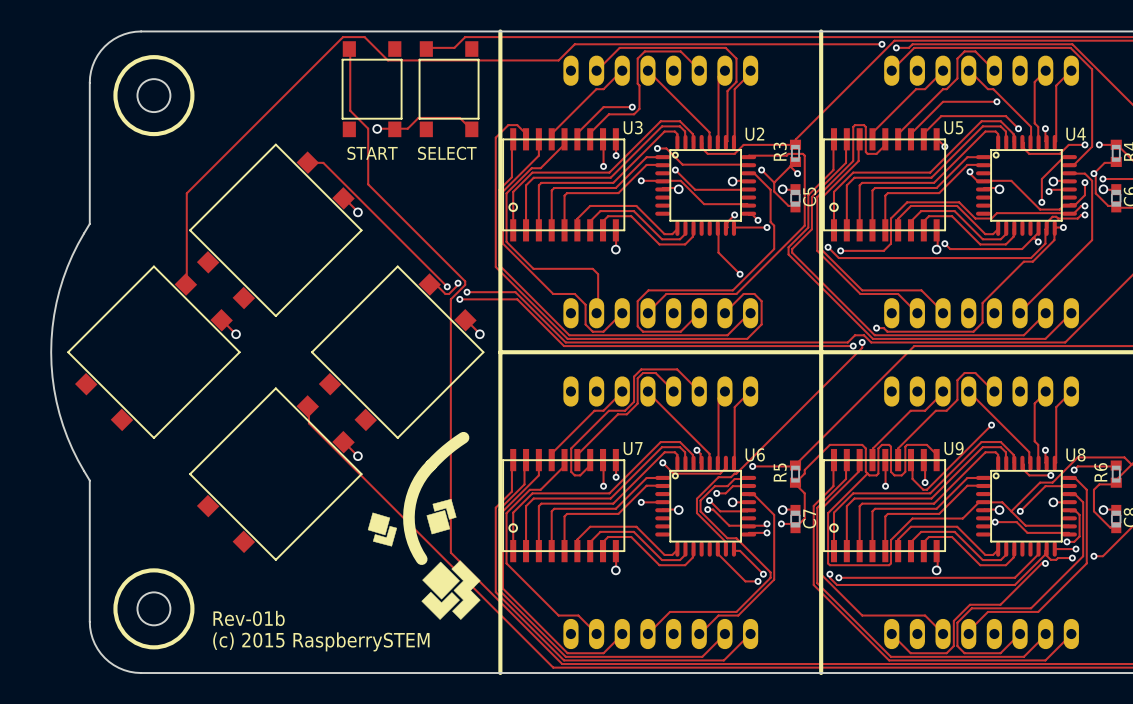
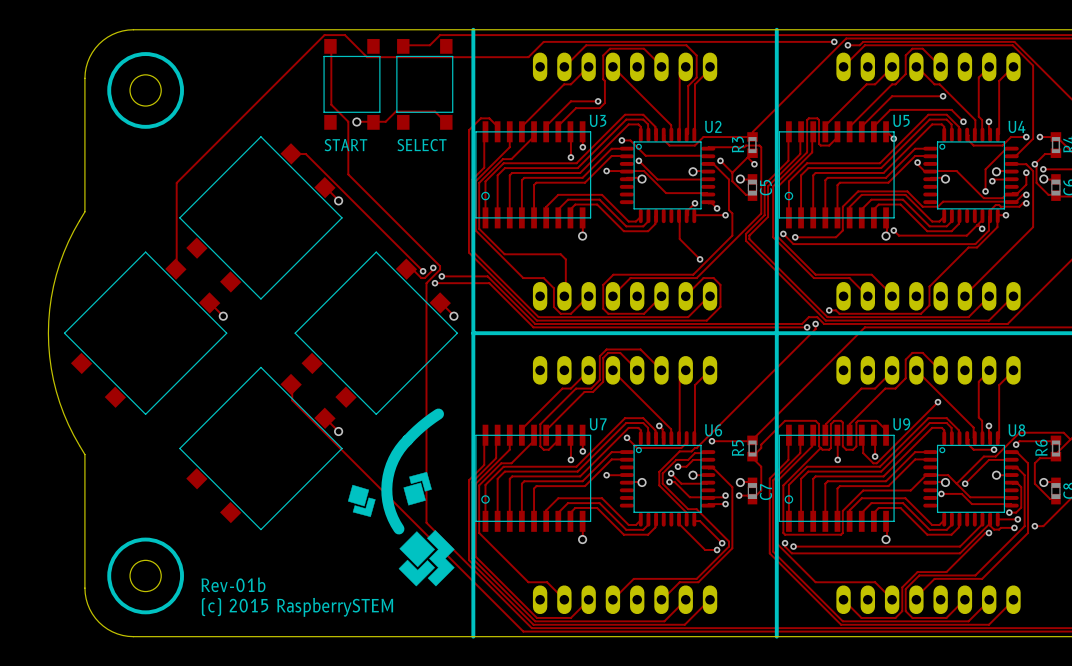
text: none -> START (345, 145)
START name: START (372, 153) -> none
SELECT name: SELECT (447, 153) -> none
text: none -> SELECT (422, 145)

